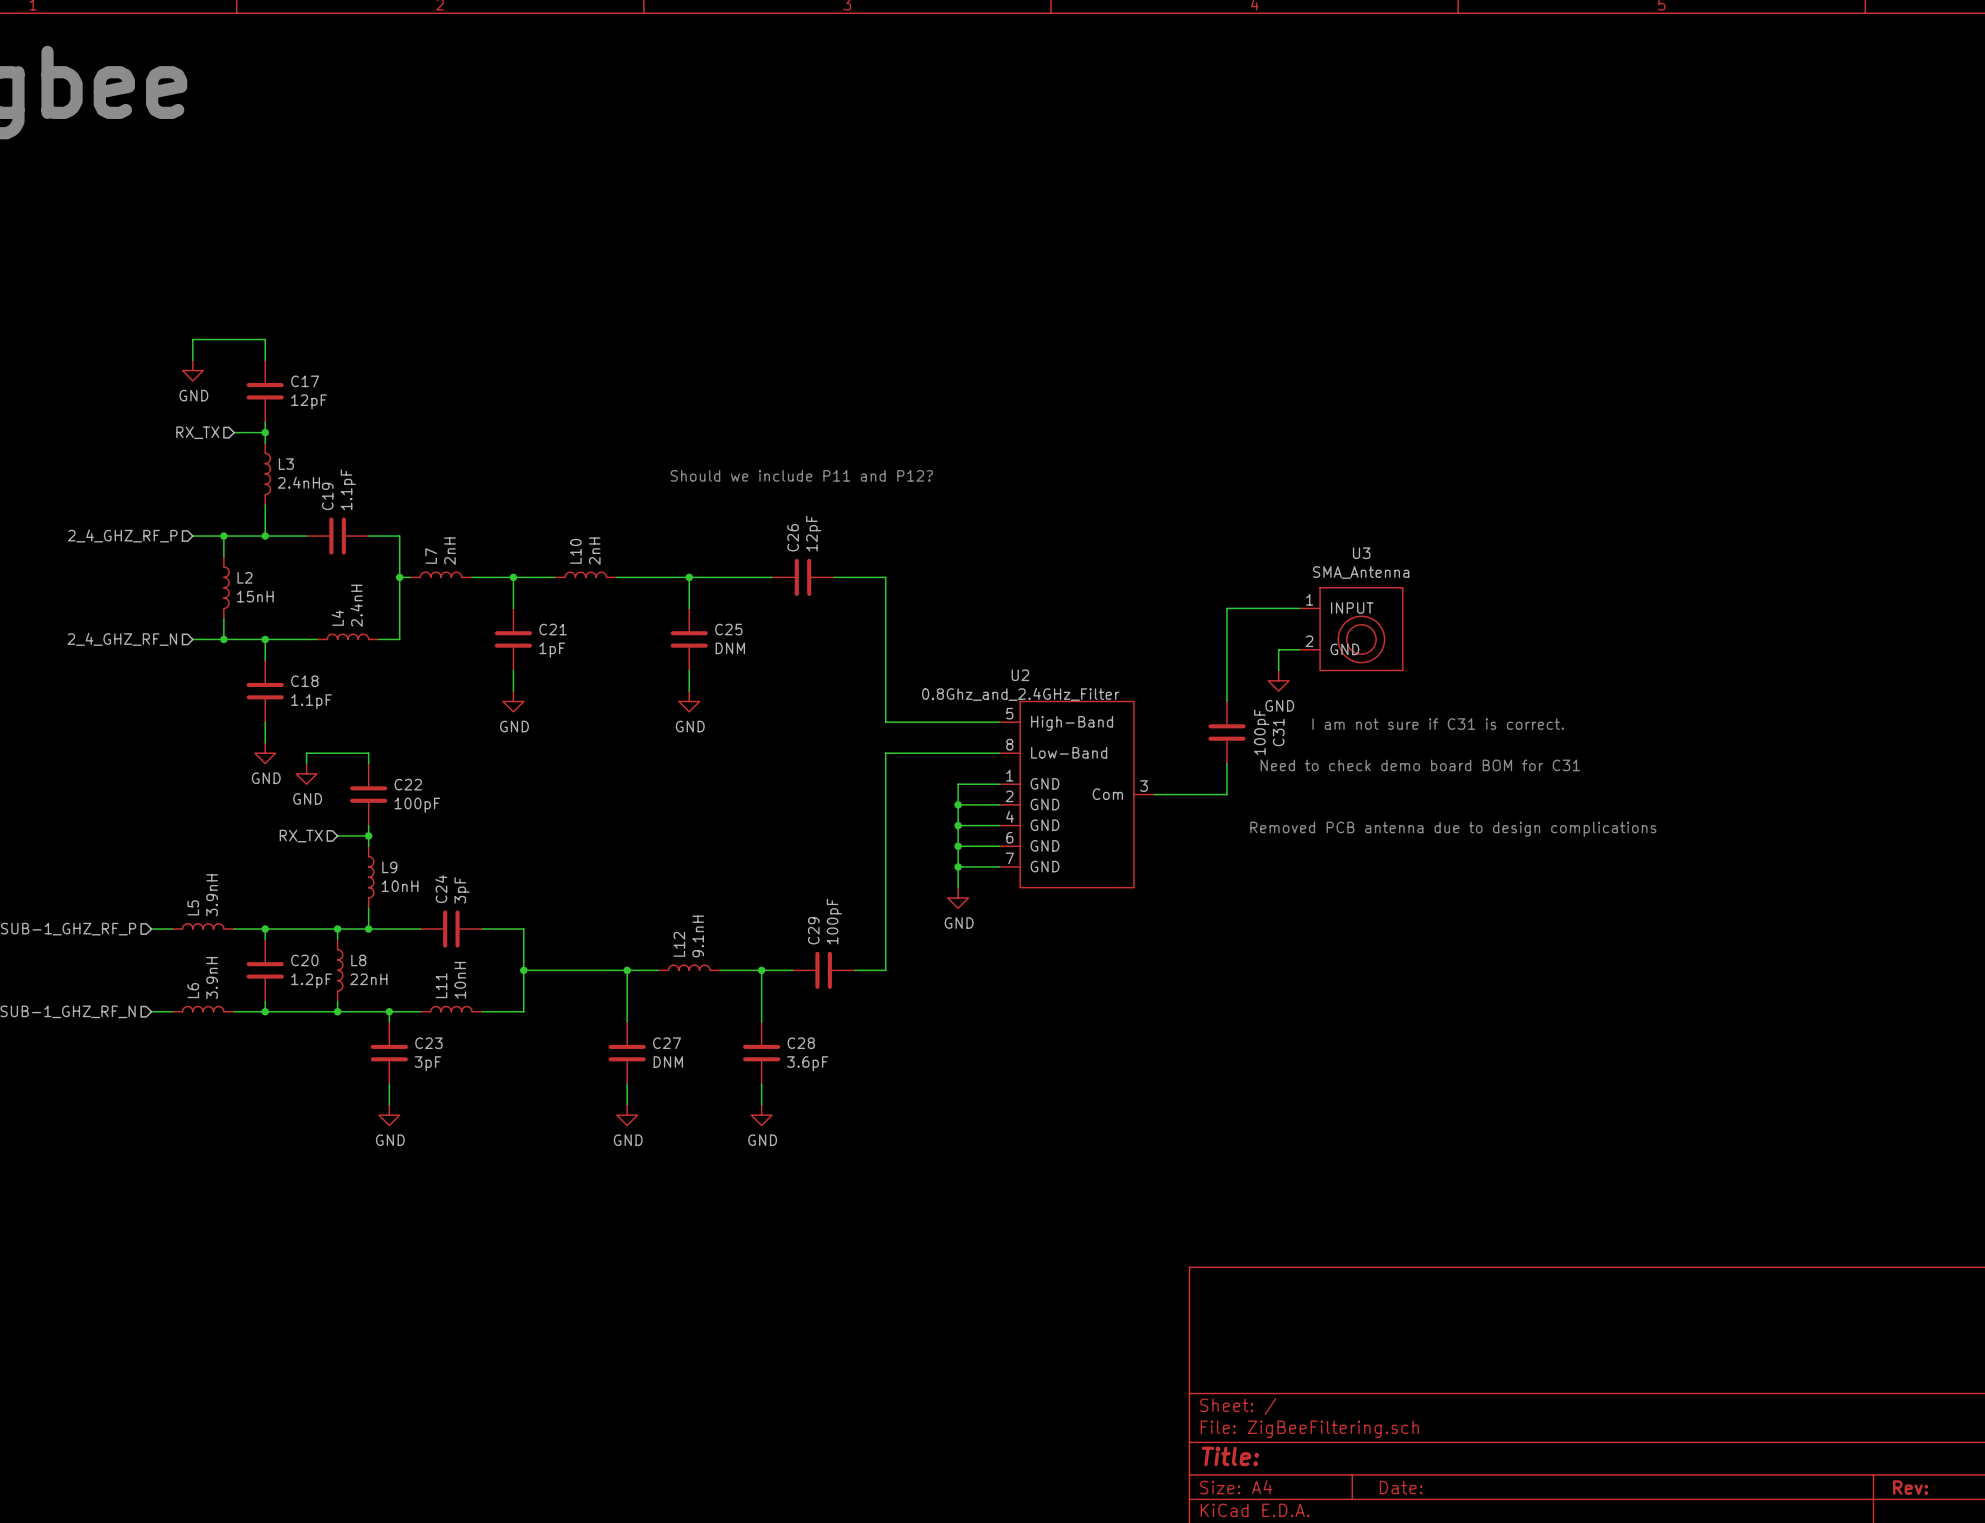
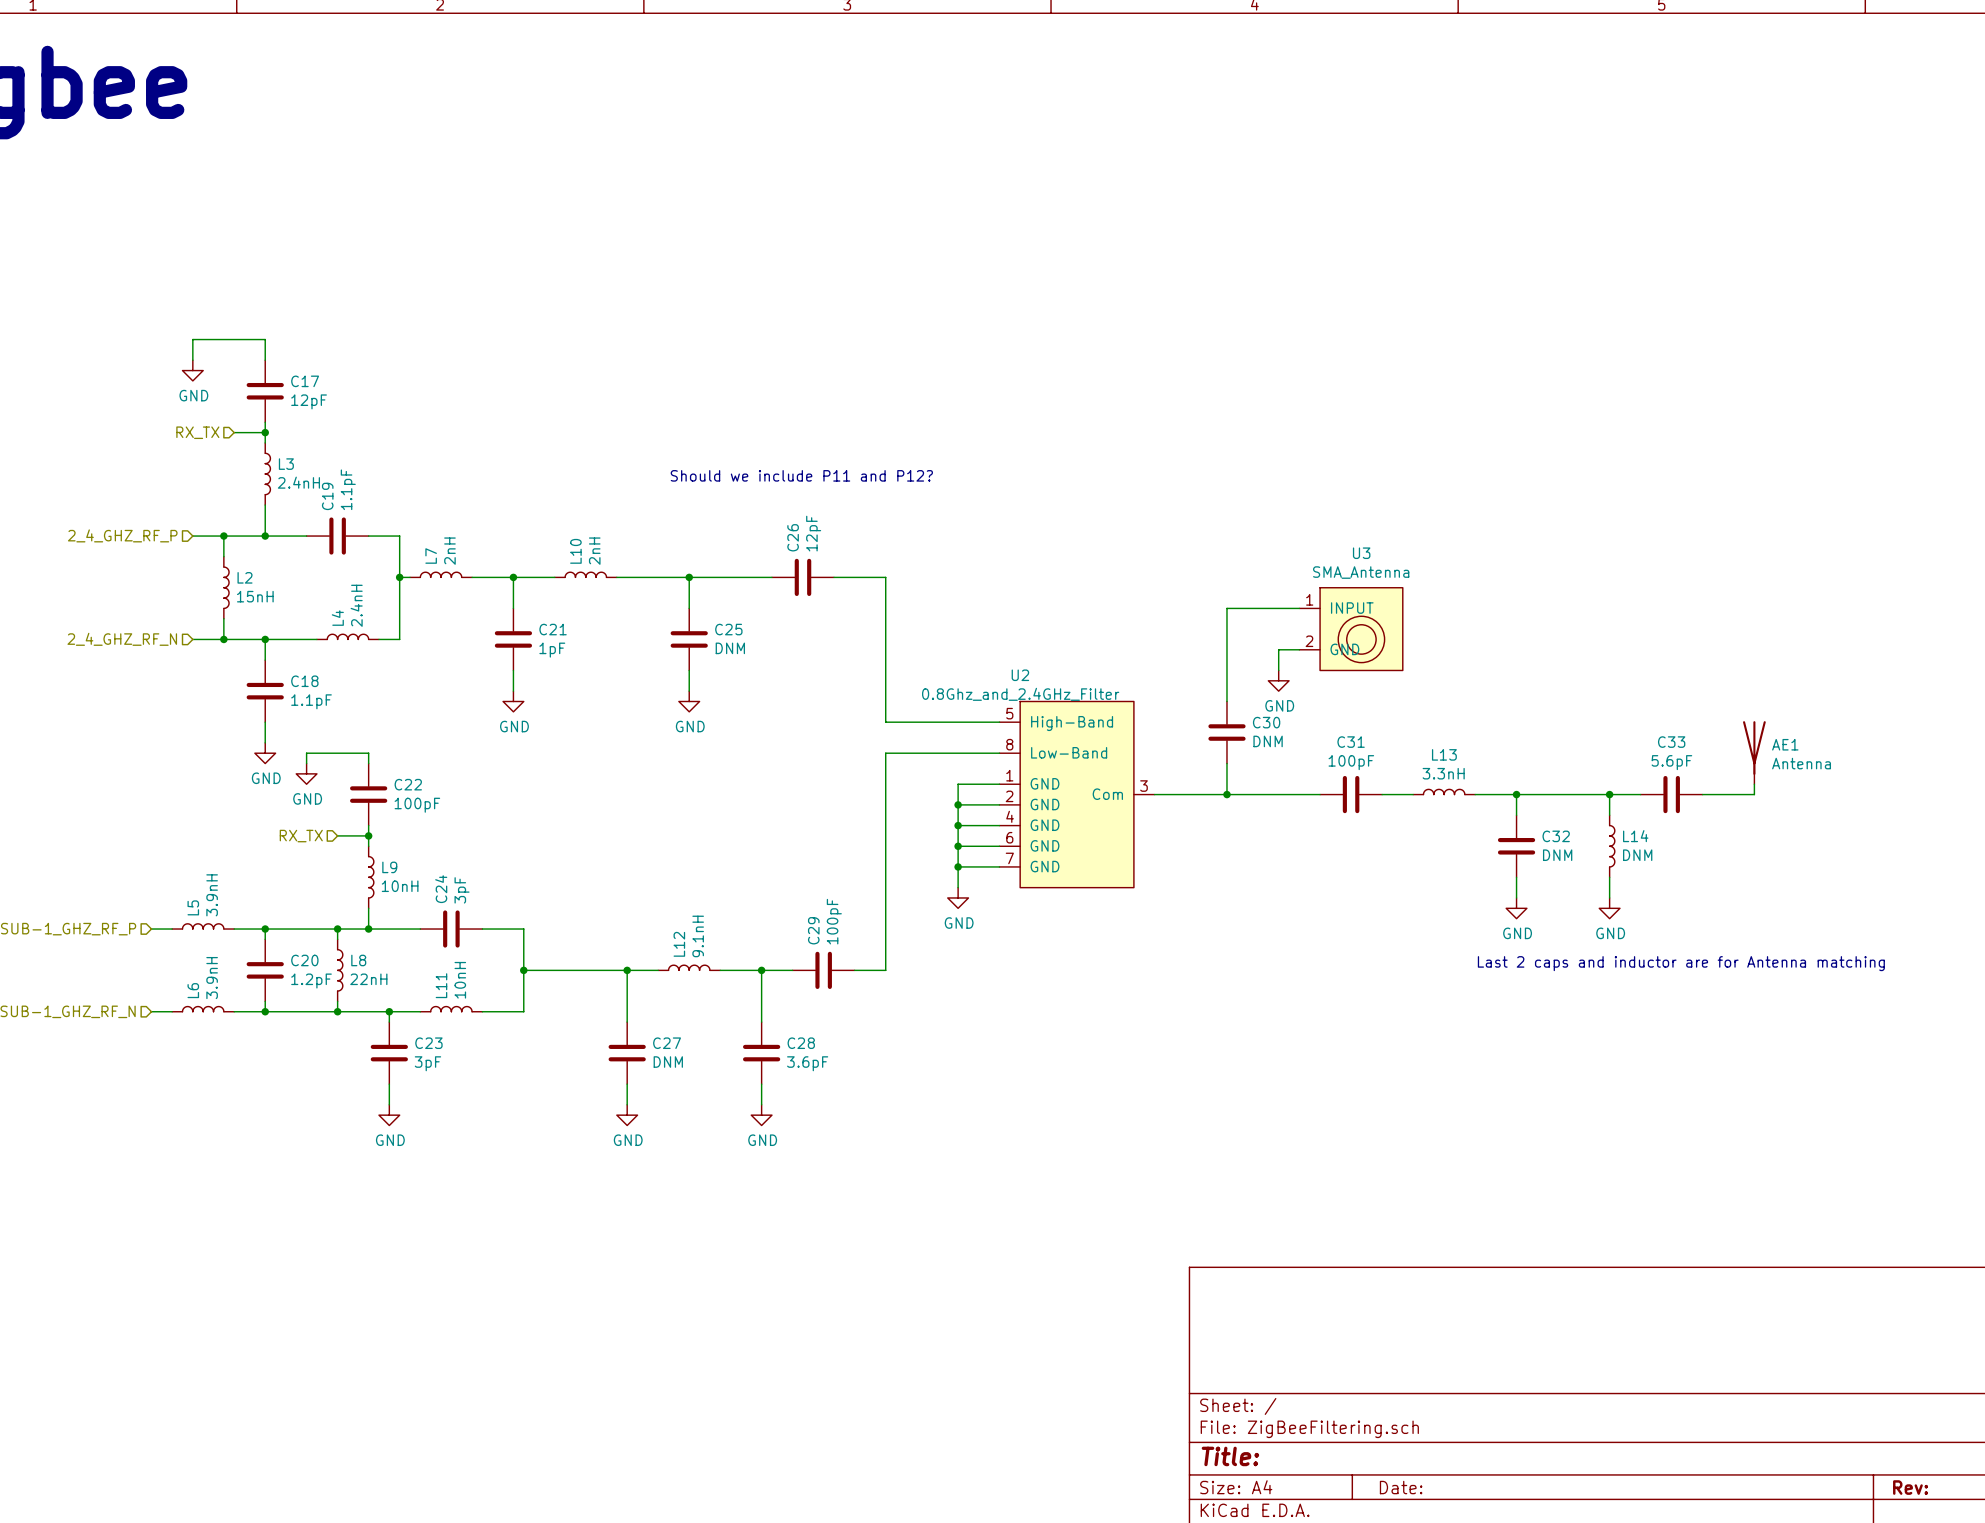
text: I am not sure if C31 is correct. (1438, 724) -> none
C31 value: 100pF (1261, 732) -> DNM (1268, 741)
C31 name: C31 (1278, 732) -> C30 (1266, 722)
AE1: none -> Antenna (1754, 752)
text: Need to check demo board BOM for C31 (1420, 765) -> none
wire: none -> (1754, 784) (1754, 794) (1702, 794)
L13: none -> 3.3nH (1444, 791)
wire: none -> (1226, 794) (1320, 794)
junction: none -> (1226, 794)
C31: none -> 100pF (1351, 794)
wire: none -> (1382, 794) (1413, 794)
wire: none -> (1475, 794) (1640, 794)
wire: none -> (1516, 794) (1516, 815)
junction: none -> (1516, 794)
wire: none -> (1609, 794) (1609, 815)
junction: none -> (1609, 794)
C33: none -> 5.6pF (1671, 794)
text: Removed PCB antenna due to design complications (1453, 829) -> none
C32: none -> DNM (1516, 846)
L14: none -> DNM (1612, 846)
wire: none -> (1516, 877) (1516, 897)
wire: none -> (1609, 877) (1609, 897)
power symbol: none -> GND (1516, 908)
power symbol: none -> GND (1609, 908)
text: none -> Last 2 caps and inductor are for Antenna matching (1681, 963)

